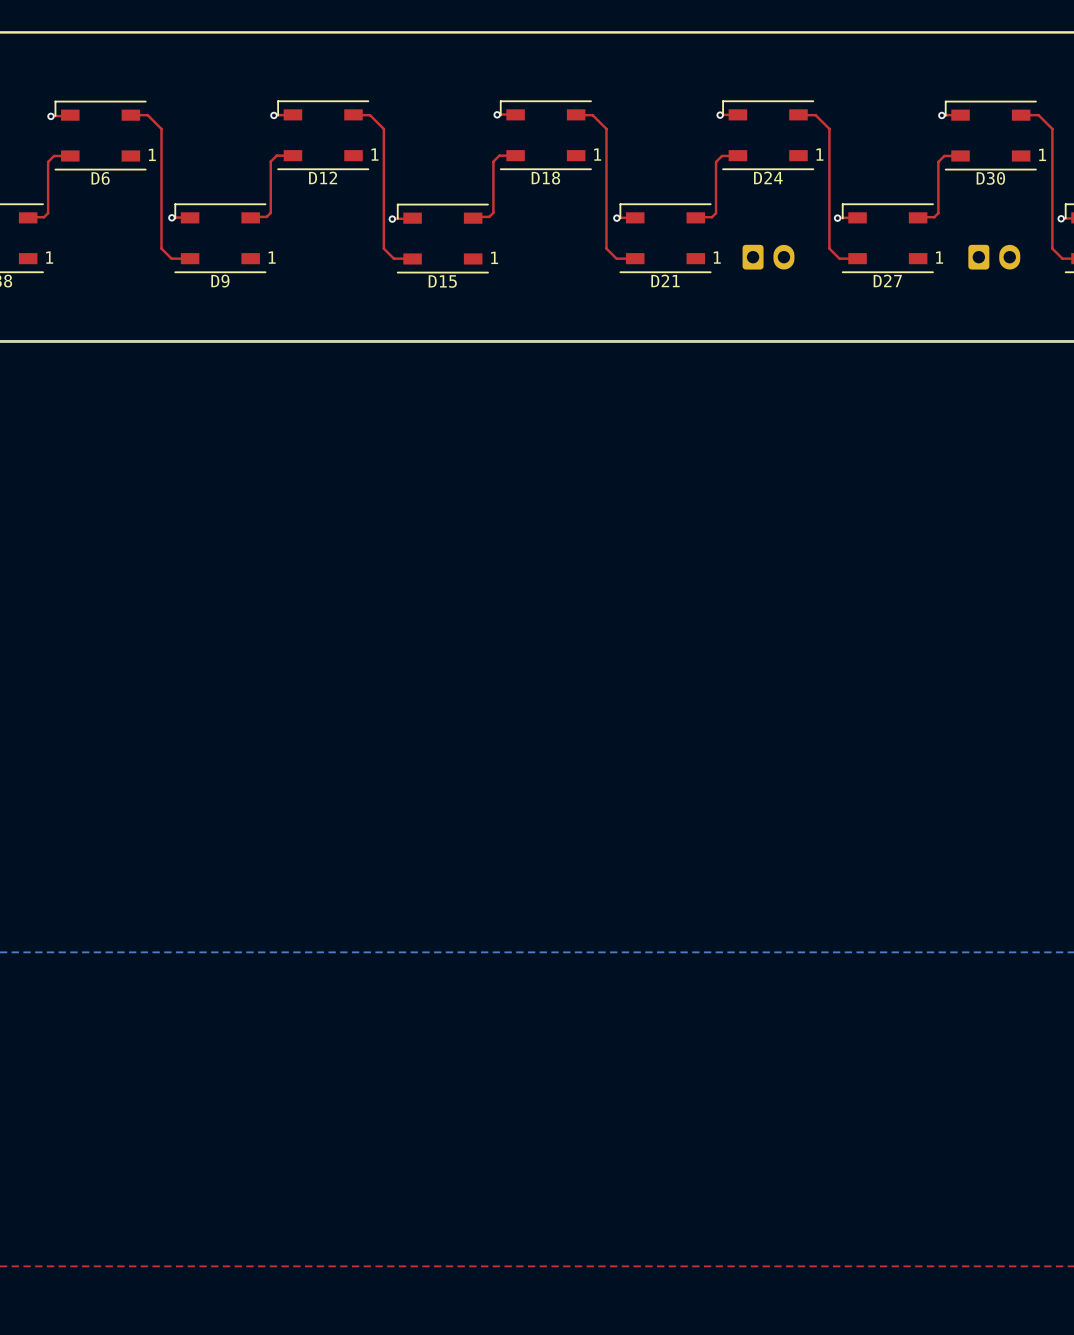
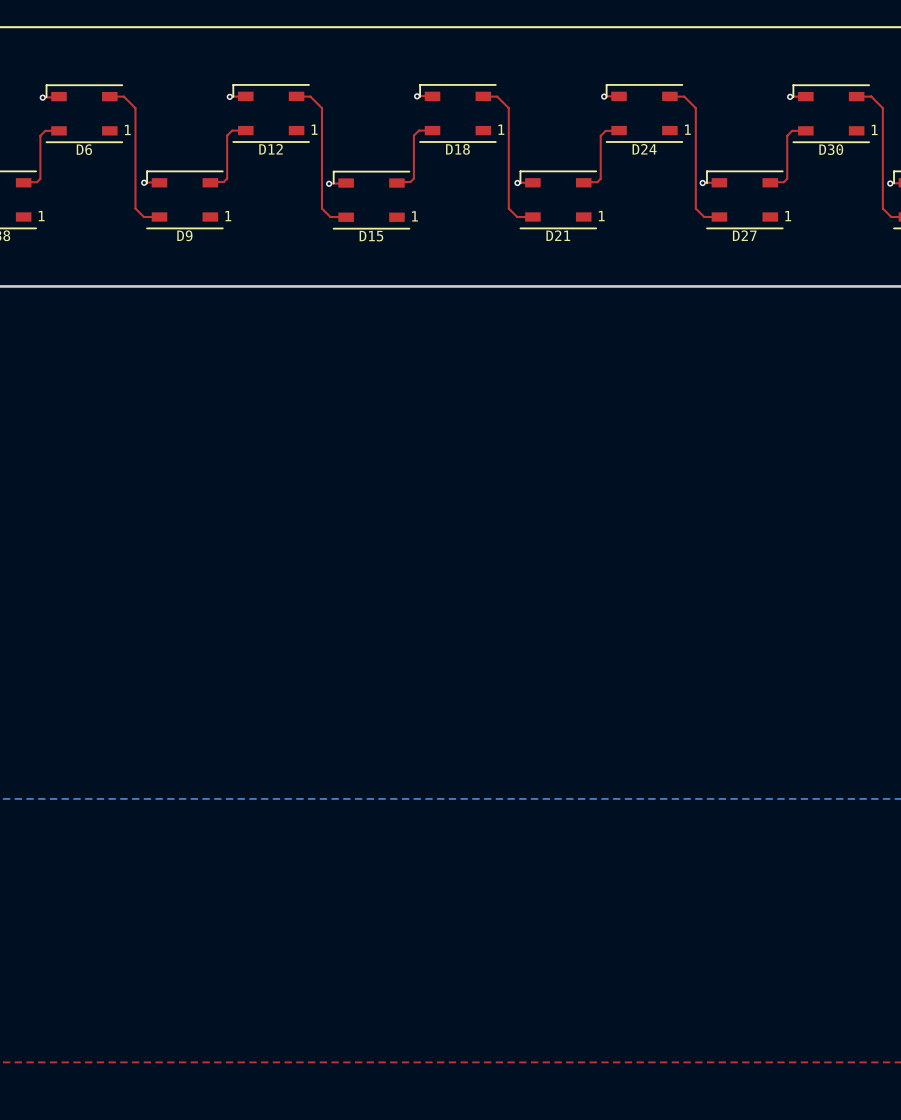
part: (768, 257) -> none
part: (994, 257) -> none

